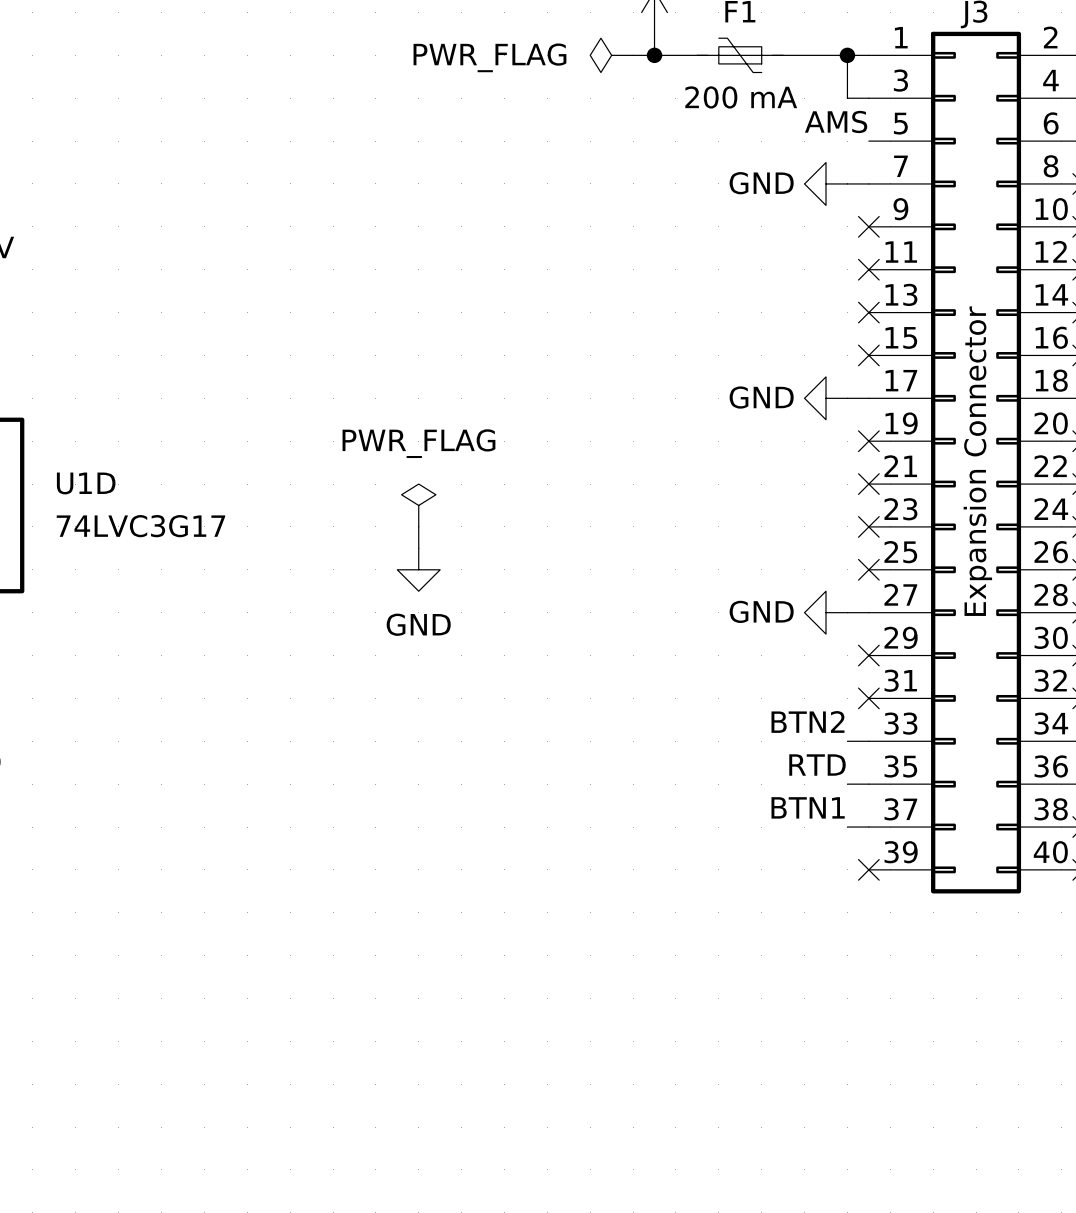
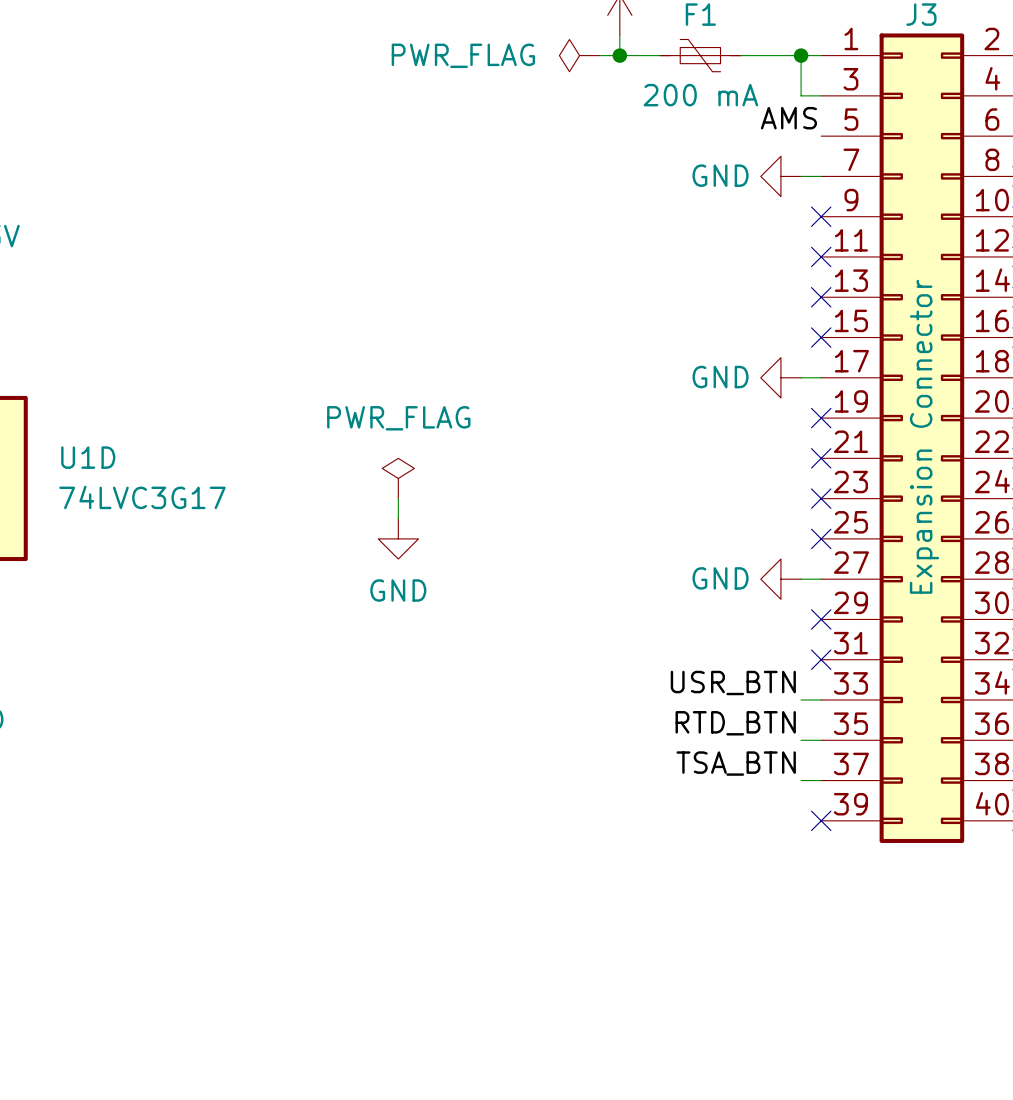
label: BTN2 (807, 721) -> USR_BTN (733, 682)
label: RTD (817, 765) -> RTD_BTN (735, 723)
label: BTN1 (808, 807) -> TSA_BTN (736, 763)

